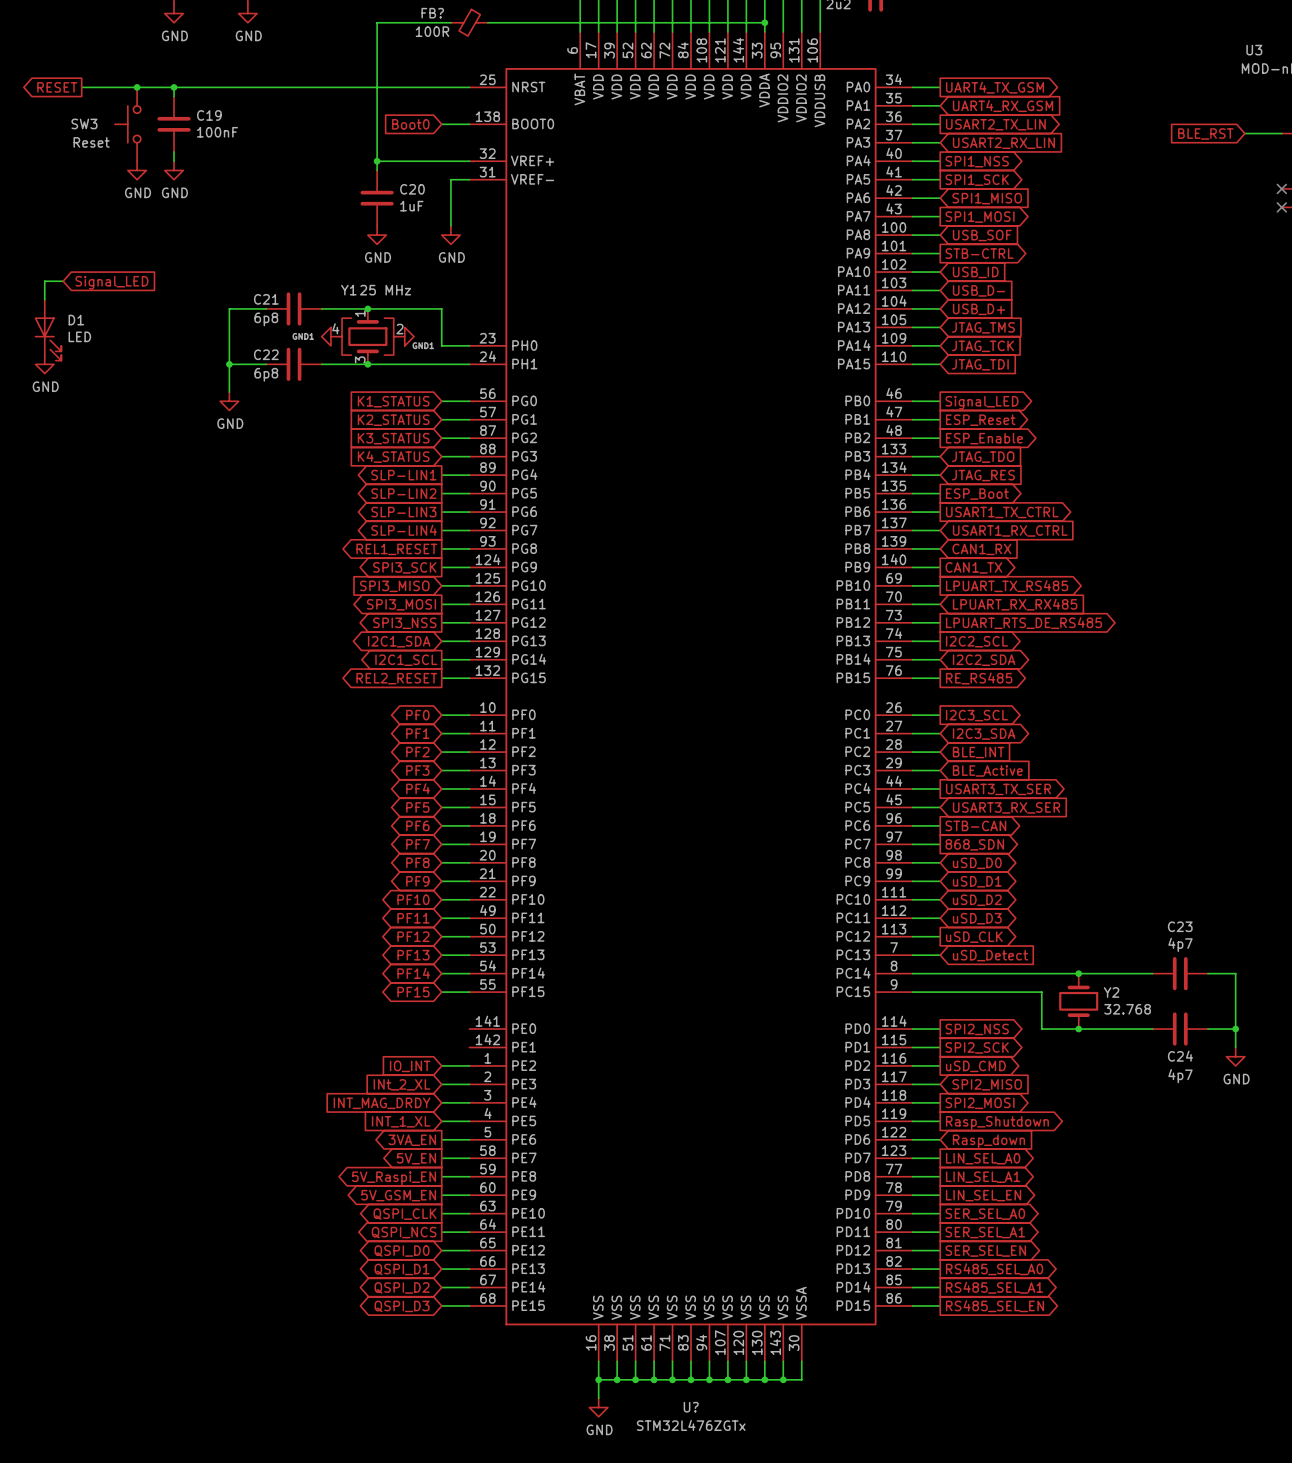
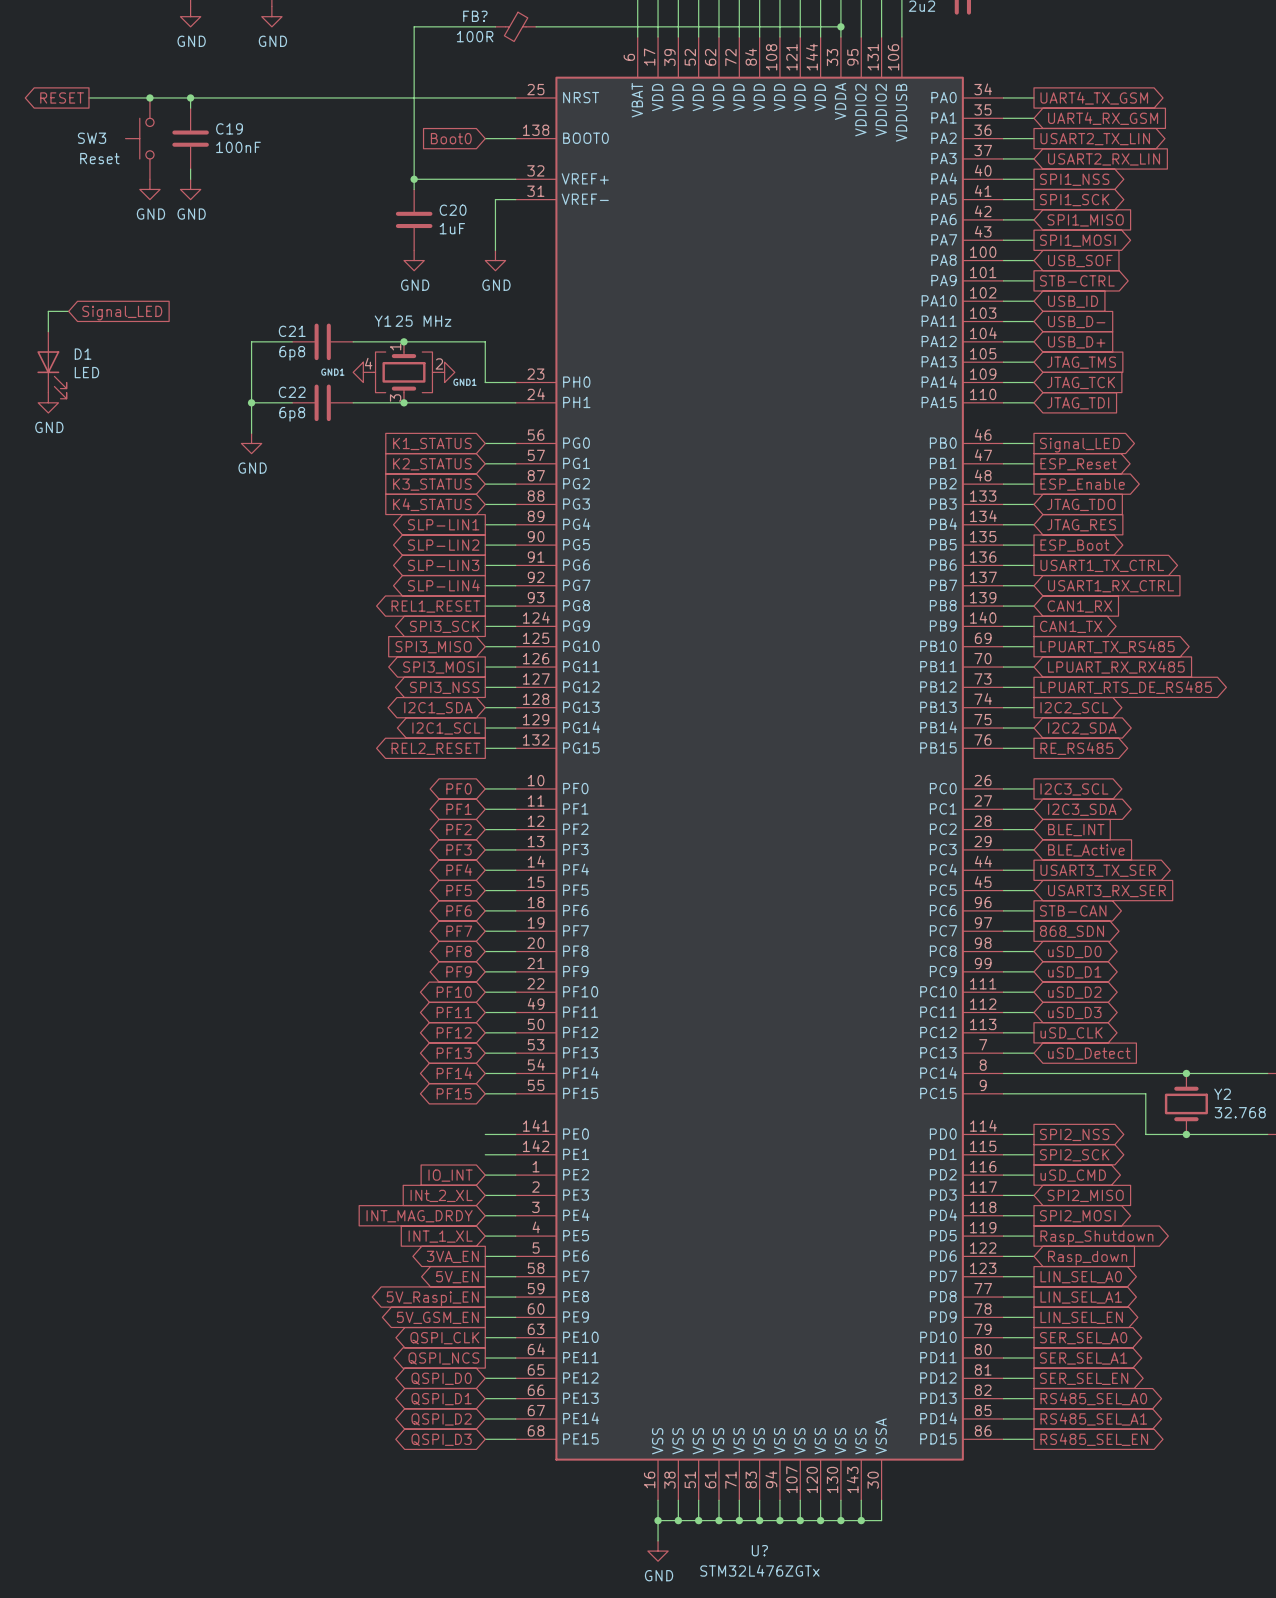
wire: none -> (485, 1134) (515, 1134)
wire: none -> (485, 1154) (515, 1154)

